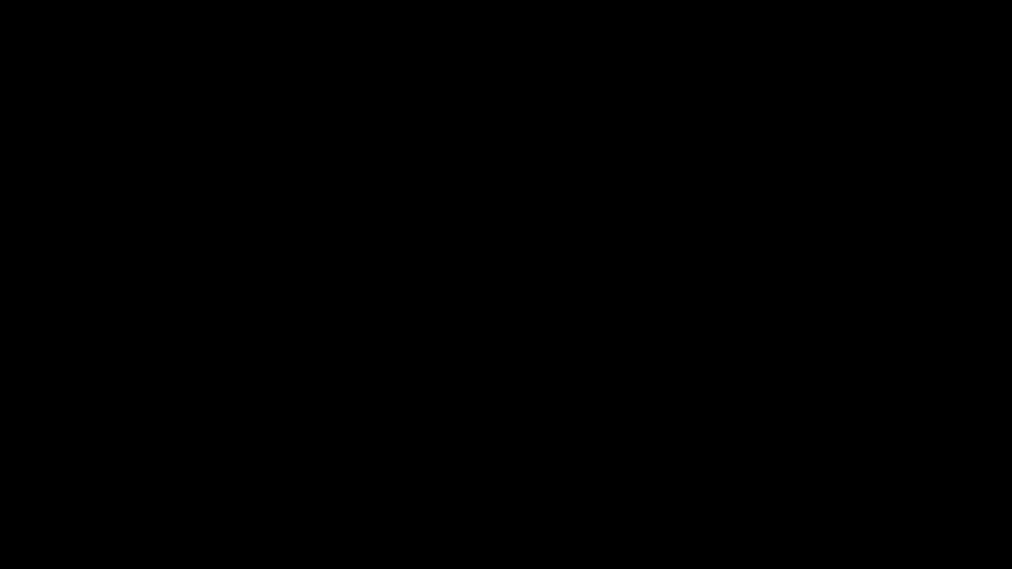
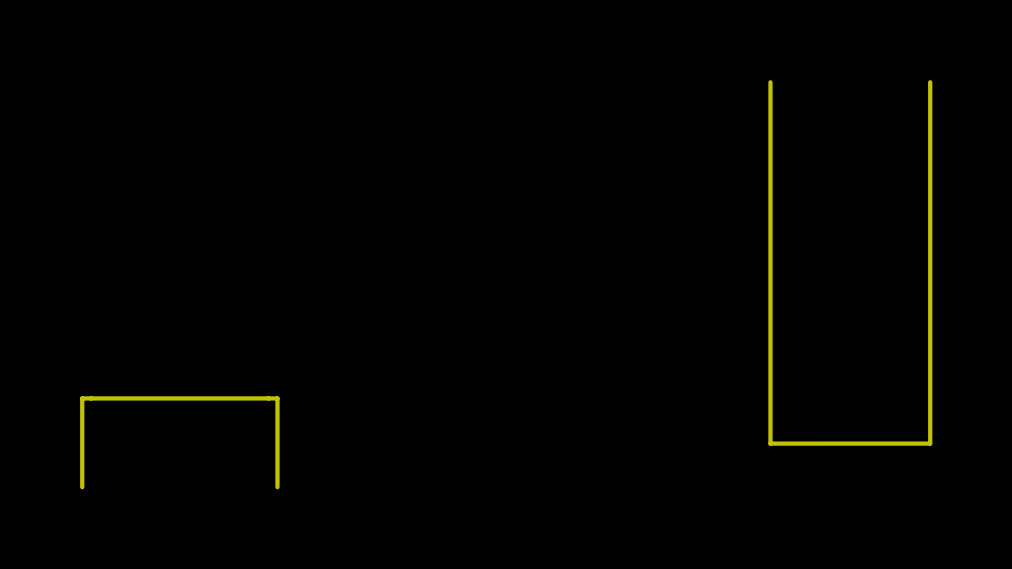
part: none -> (850, 262)
part: none -> (179, 442)

